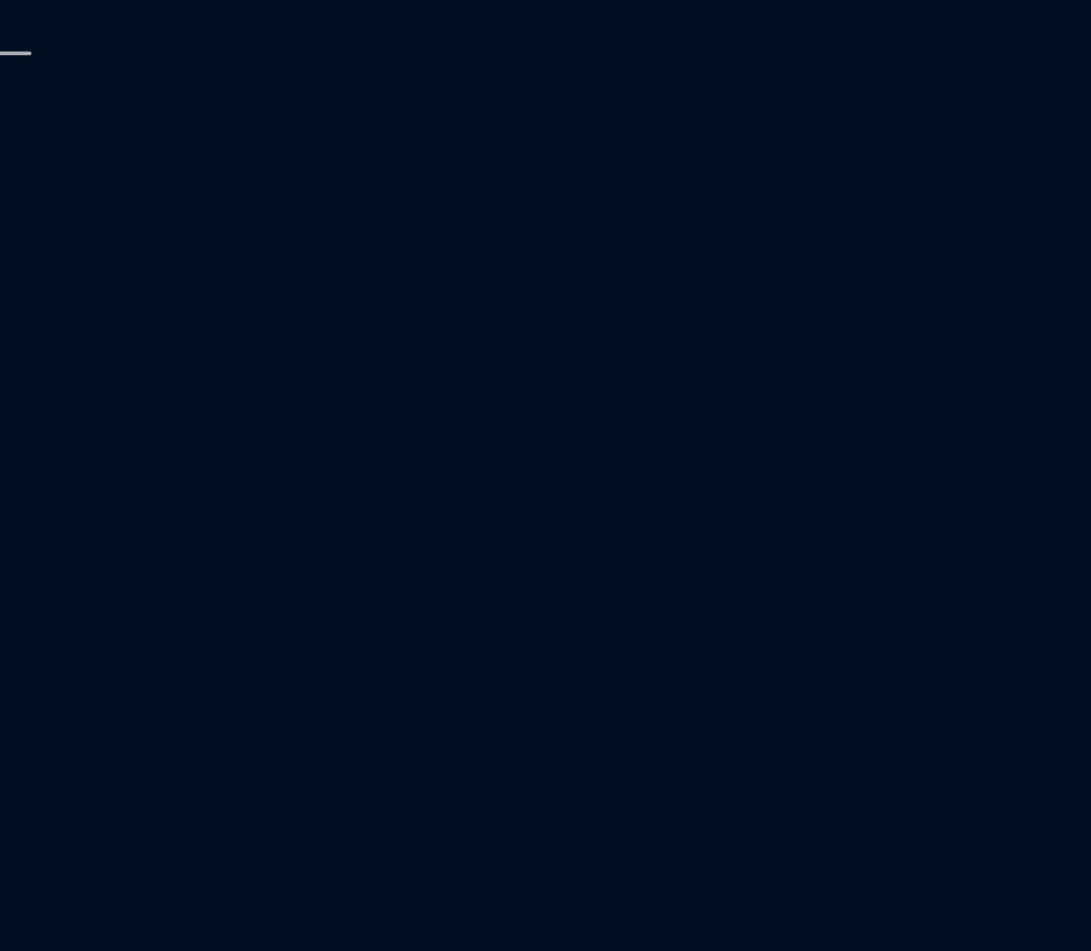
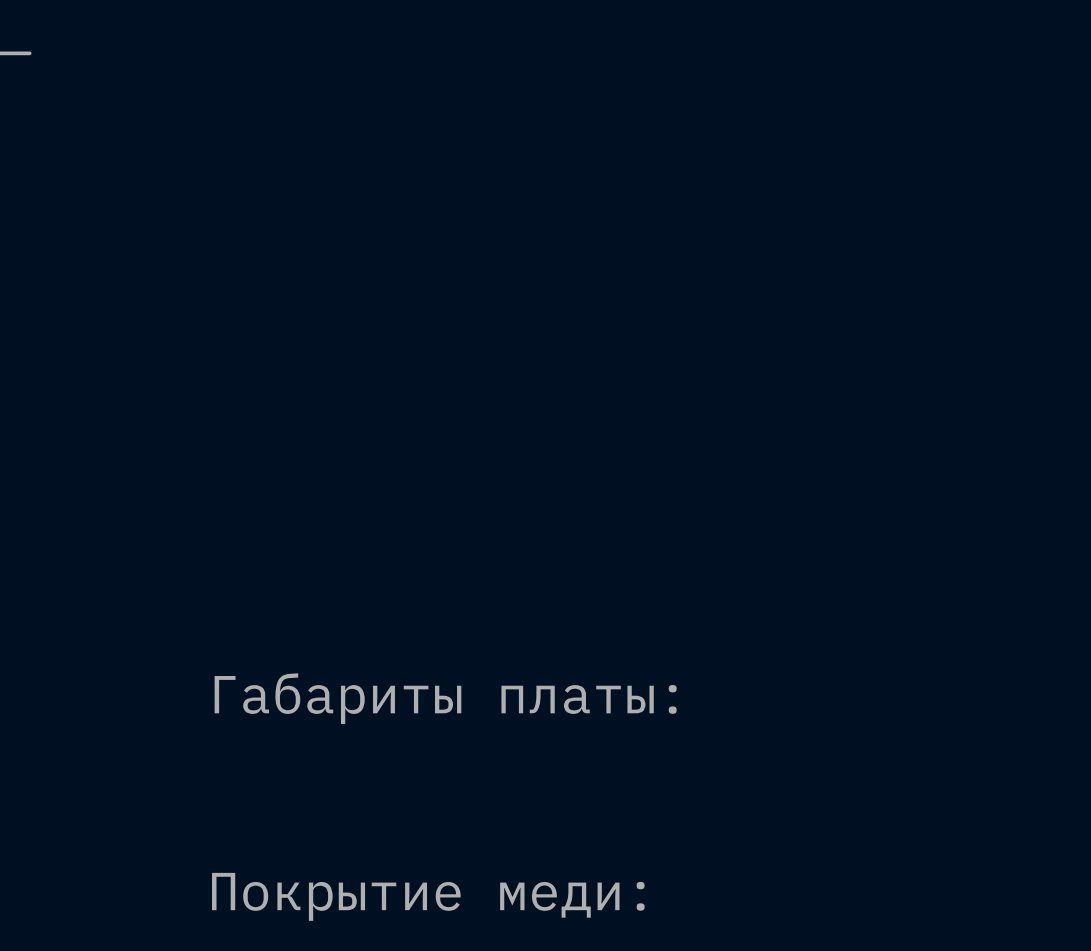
text: none -> Габариты платы: (445, 698)
text: none -> Покрытие меди: (428, 896)

